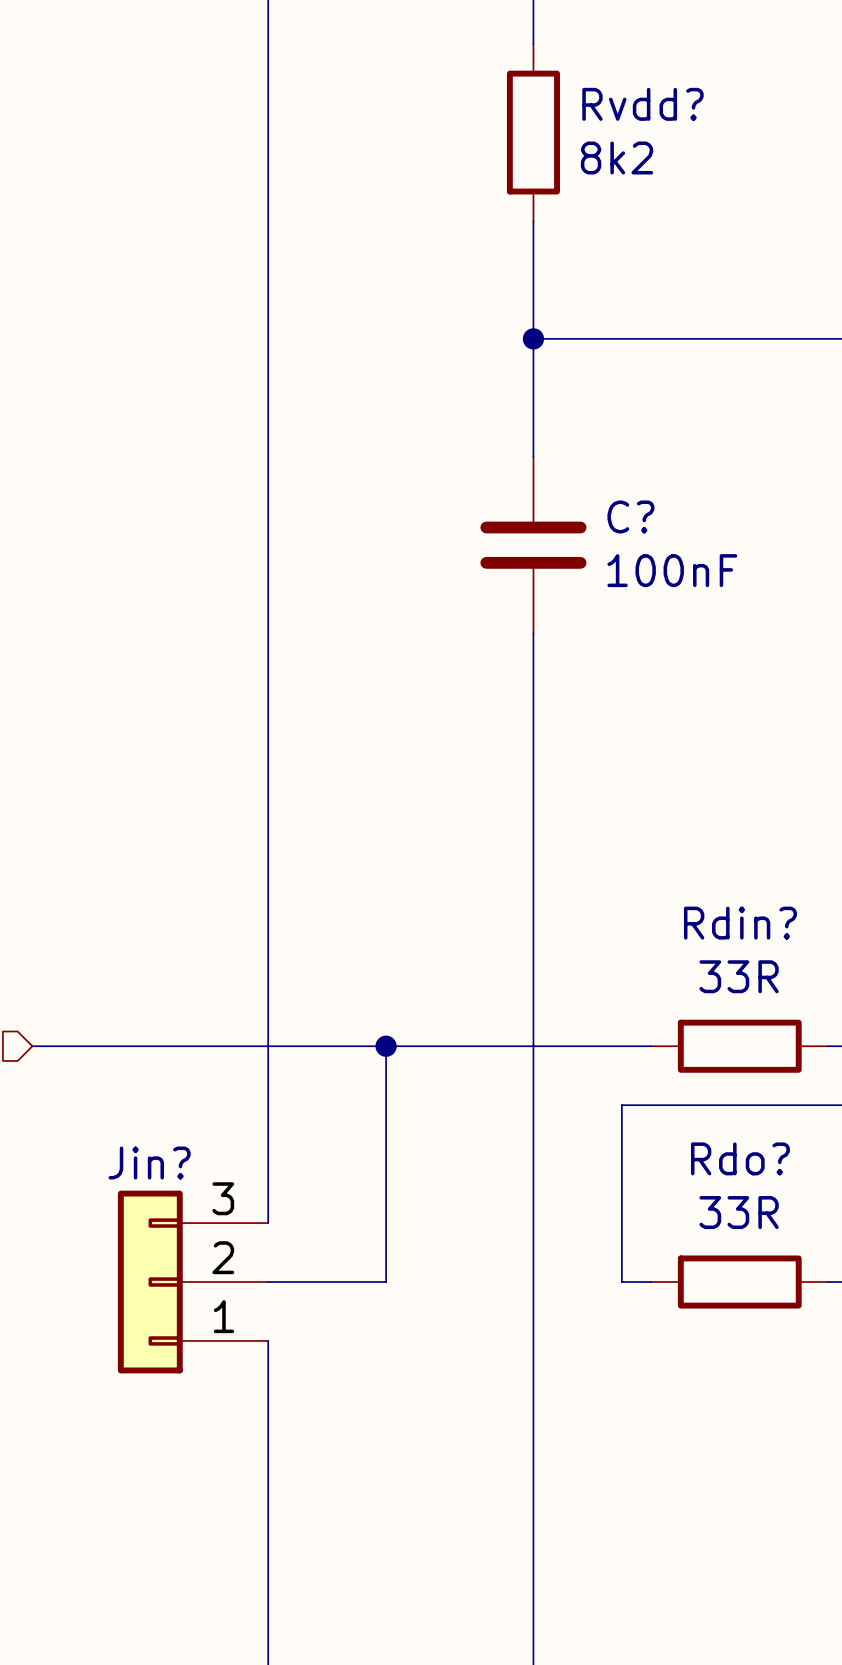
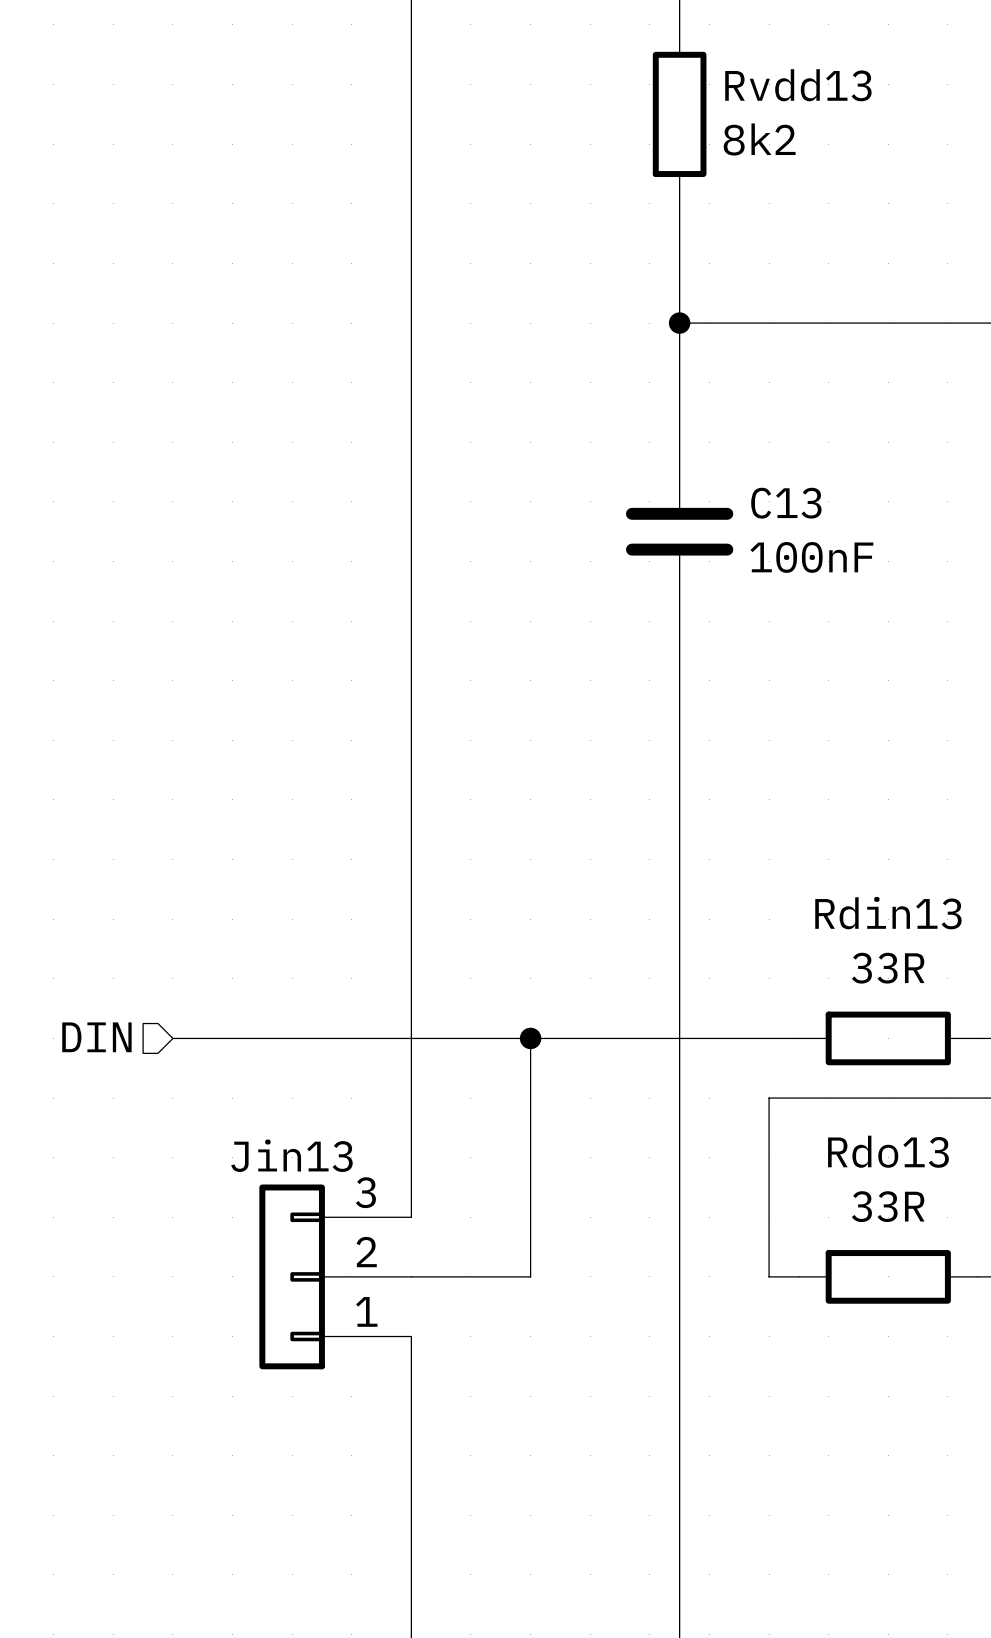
Rvdd? name: Rvdd? (643, 104) -> Rvdd13 (798, 85)
C? name: C? (630, 516) -> C13 (786, 503)
Rdin? name: Rdin? (740, 923) -> Rdin13 (888, 913)
Rdo? name: Rdo? (740, 1158) -> Rdo13 (888, 1151)
Jin? name: Jin? (149, 1163) -> Jin13 (291, 1155)

